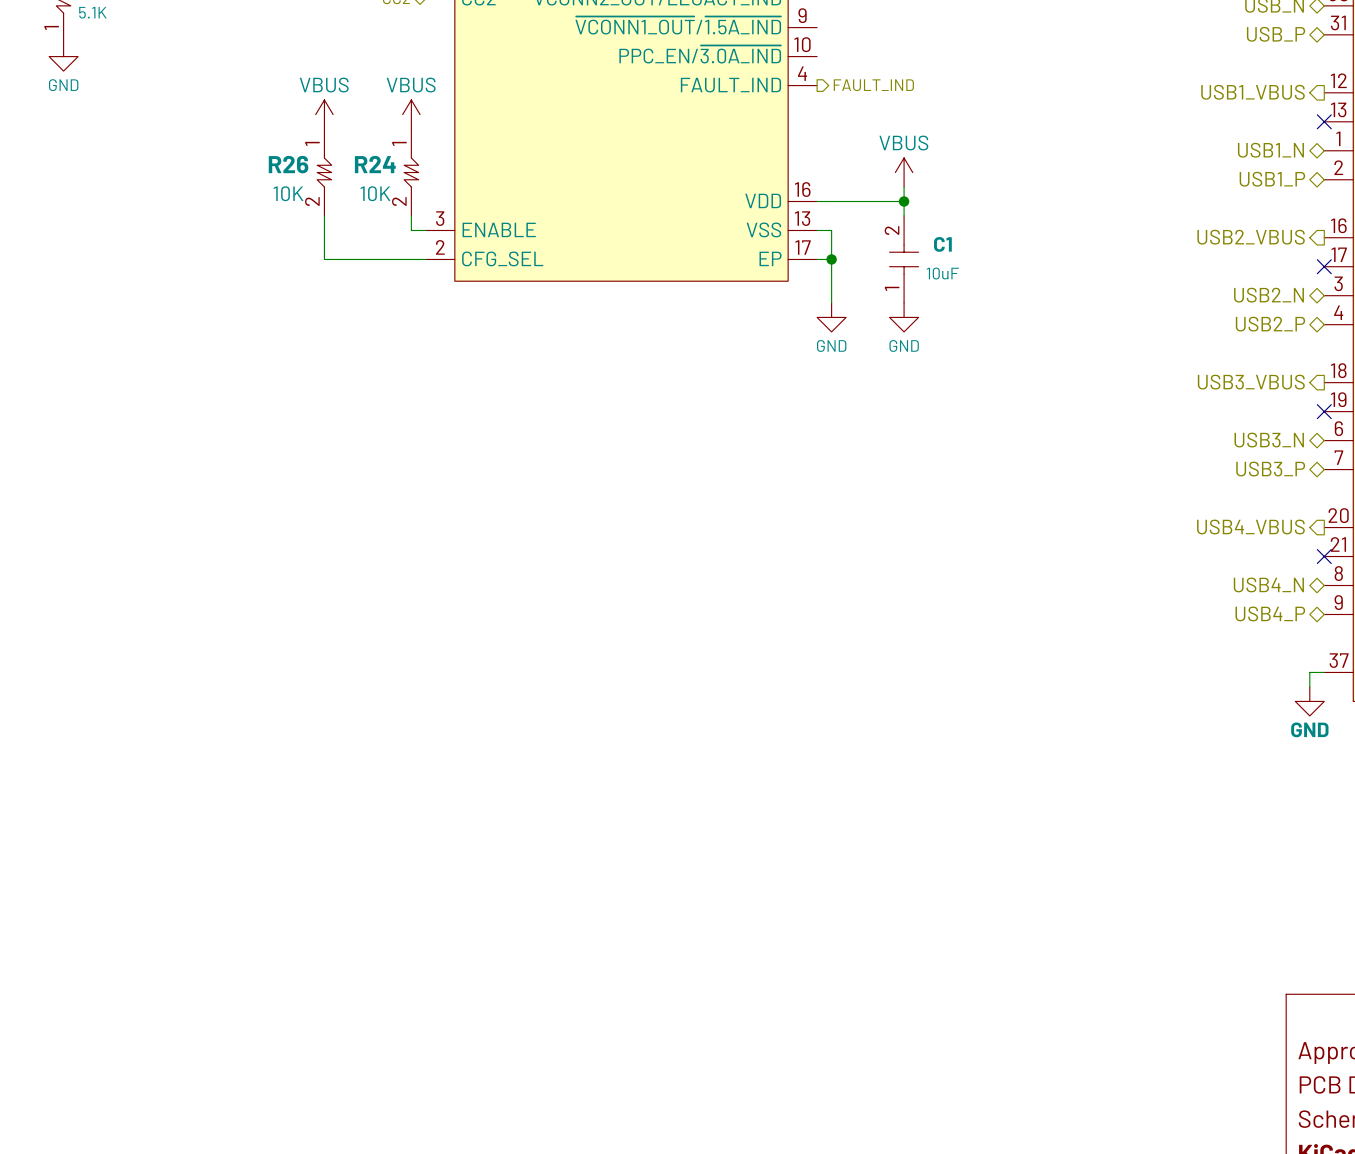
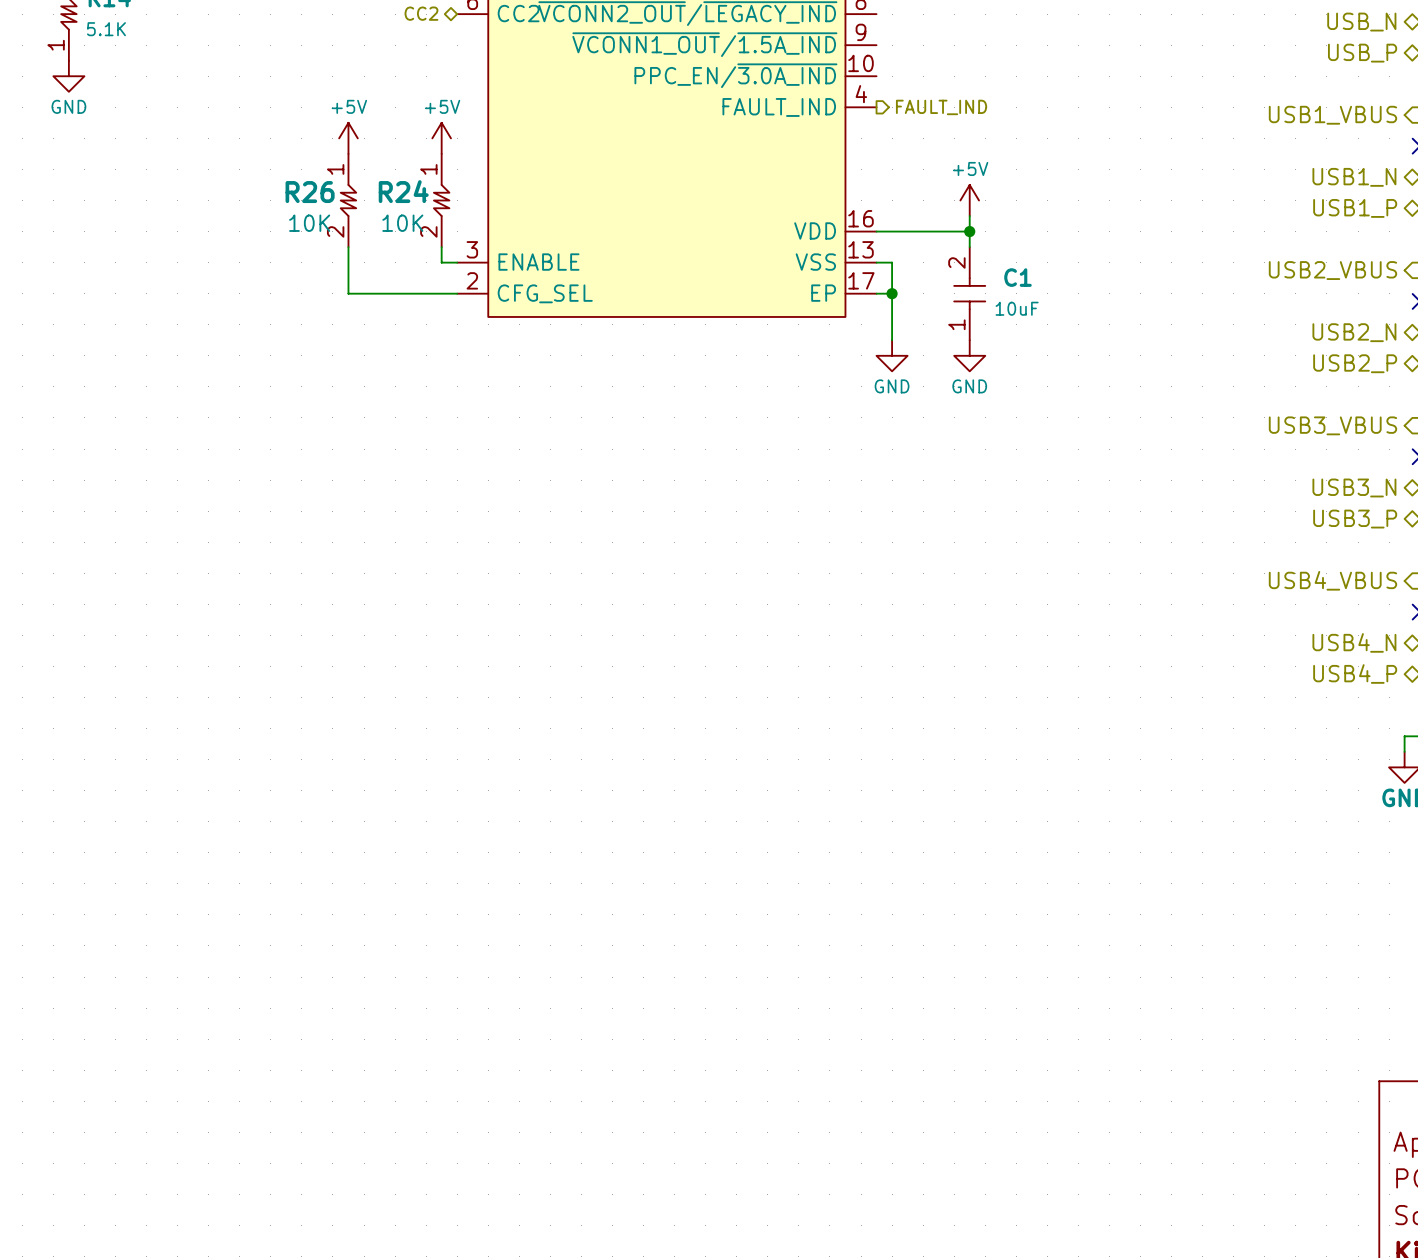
power symbol: VBUS (324, 114) -> +5V (348, 138)
power symbol: VBUS (411, 114) -> +5V (441, 138)
power symbol: VBUS (904, 172) -> +5V (969, 200)

